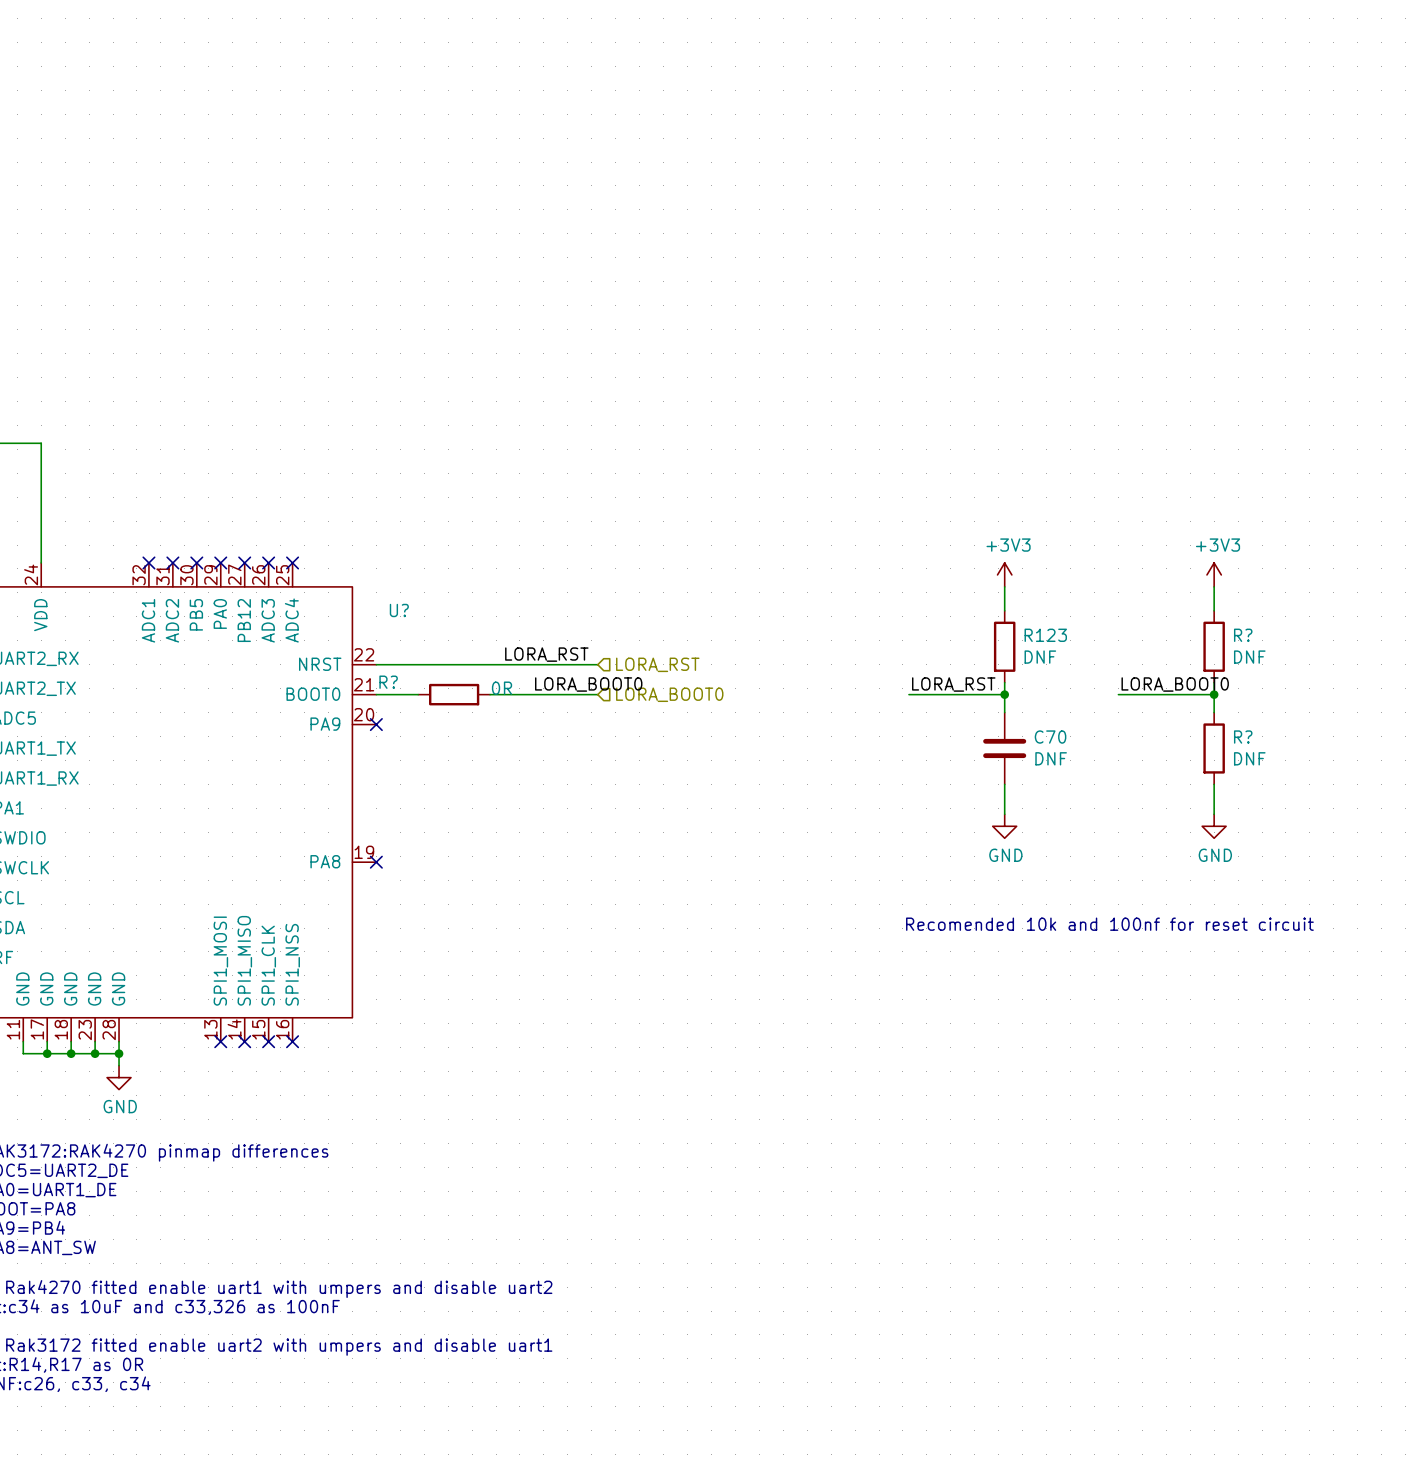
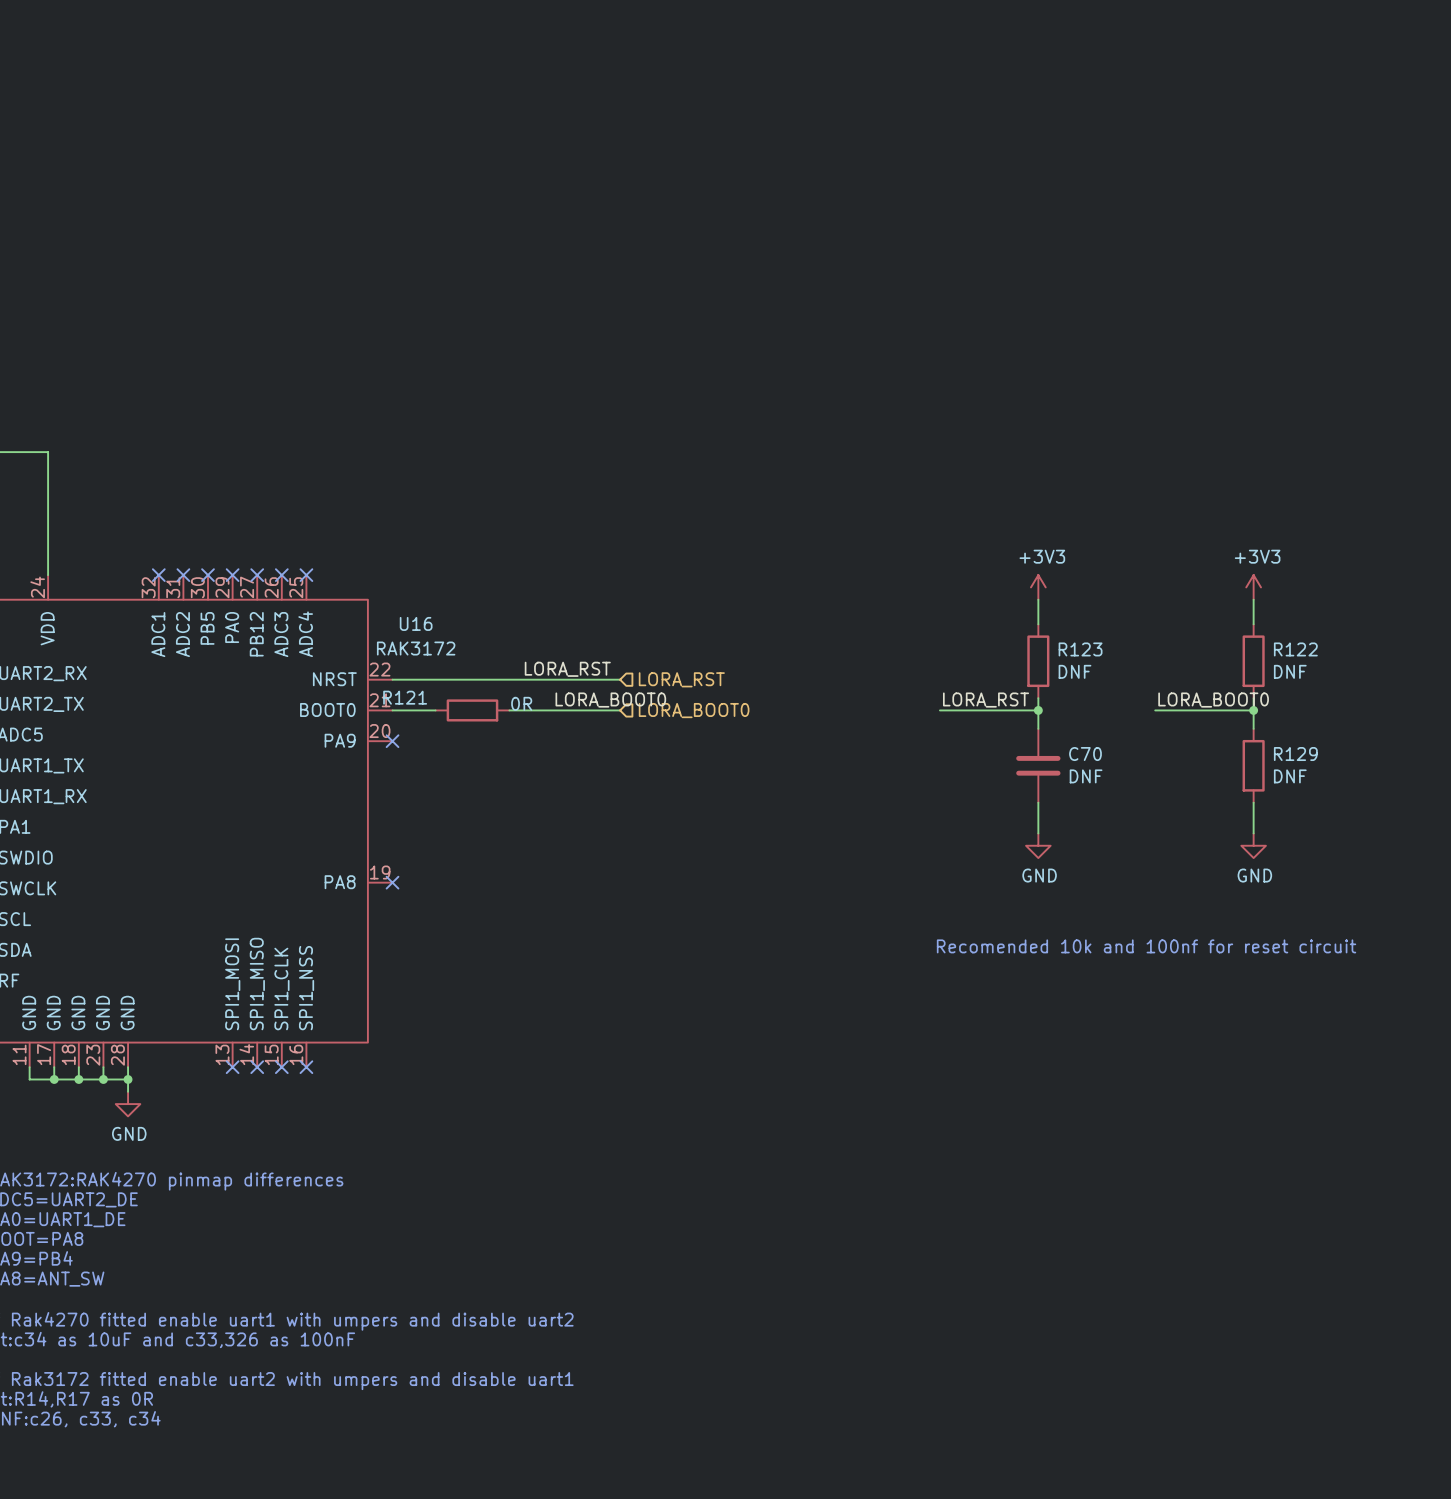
U? name: U? (399, 610) -> U16 (416, 623)
U? value: none -> RAK3172 (416, 648)
R? name: R? (1243, 635) -> R122 (1295, 649)
R? name: R? (388, 682) -> R121 (405, 697)
R? name: R? (1243, 737) -> R129 (1295, 754)

